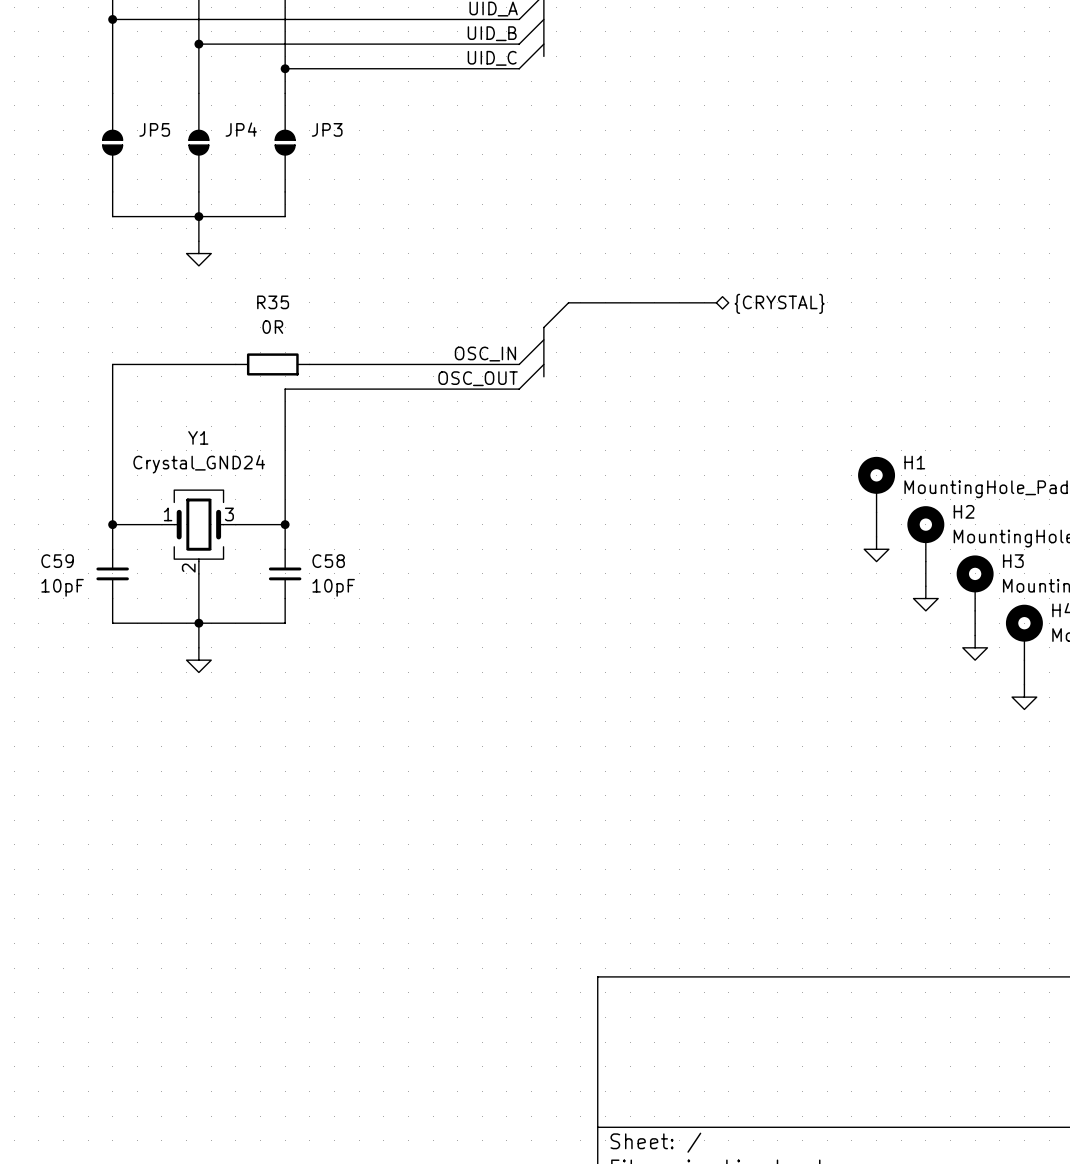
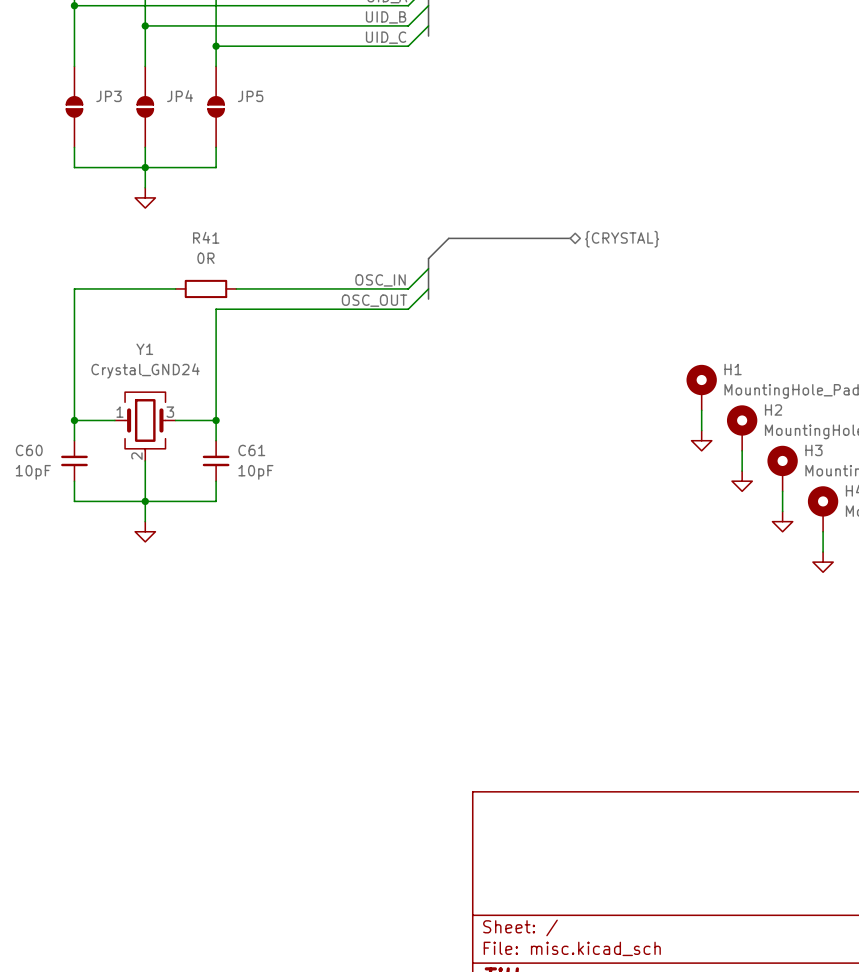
JP5 name: JP5 (154, 129) -> JP3 (108, 96)
JP3 name: JP3 (327, 129) -> JP5 (250, 96)
R35 name: R35 (273, 302) -> R41 (206, 237)
C59 name: C59 (57, 561) -> C60 (29, 450)
C58 name: C58 (328, 561) -> C61 (251, 450)

